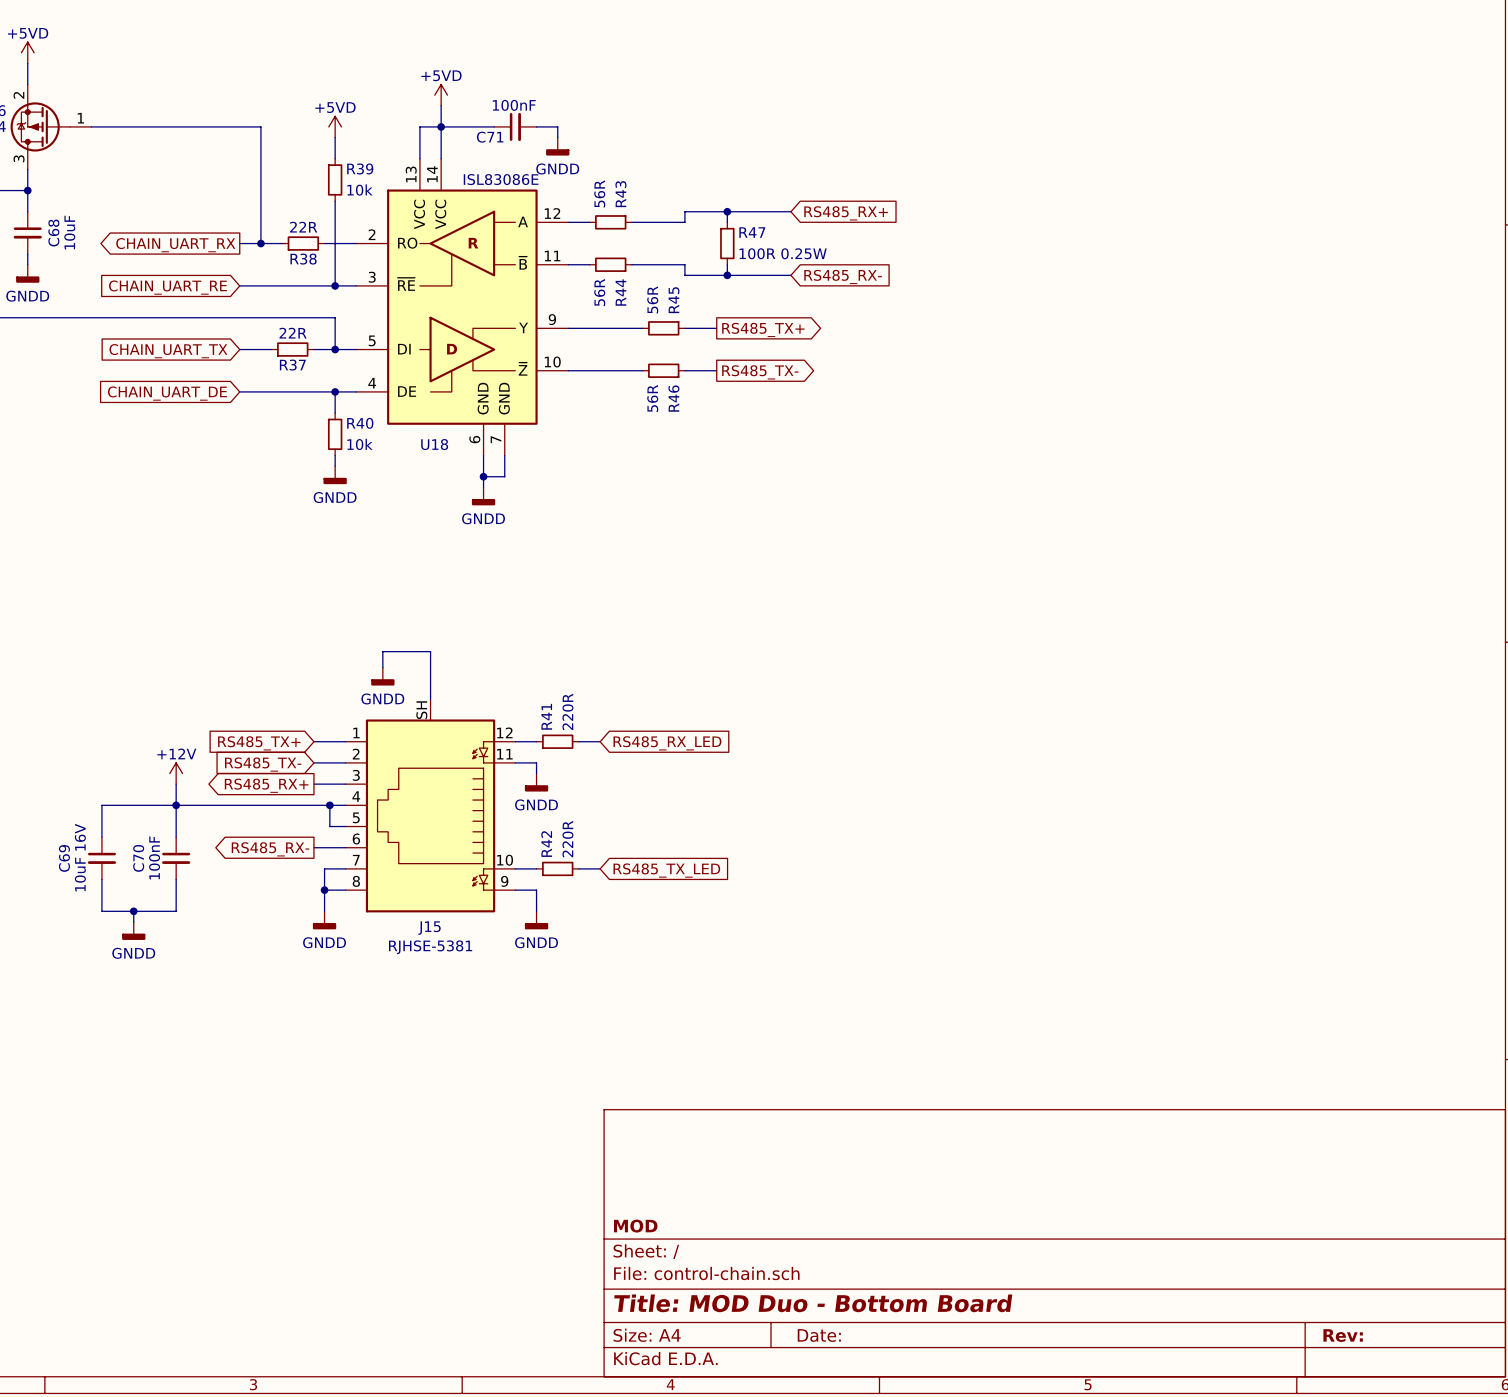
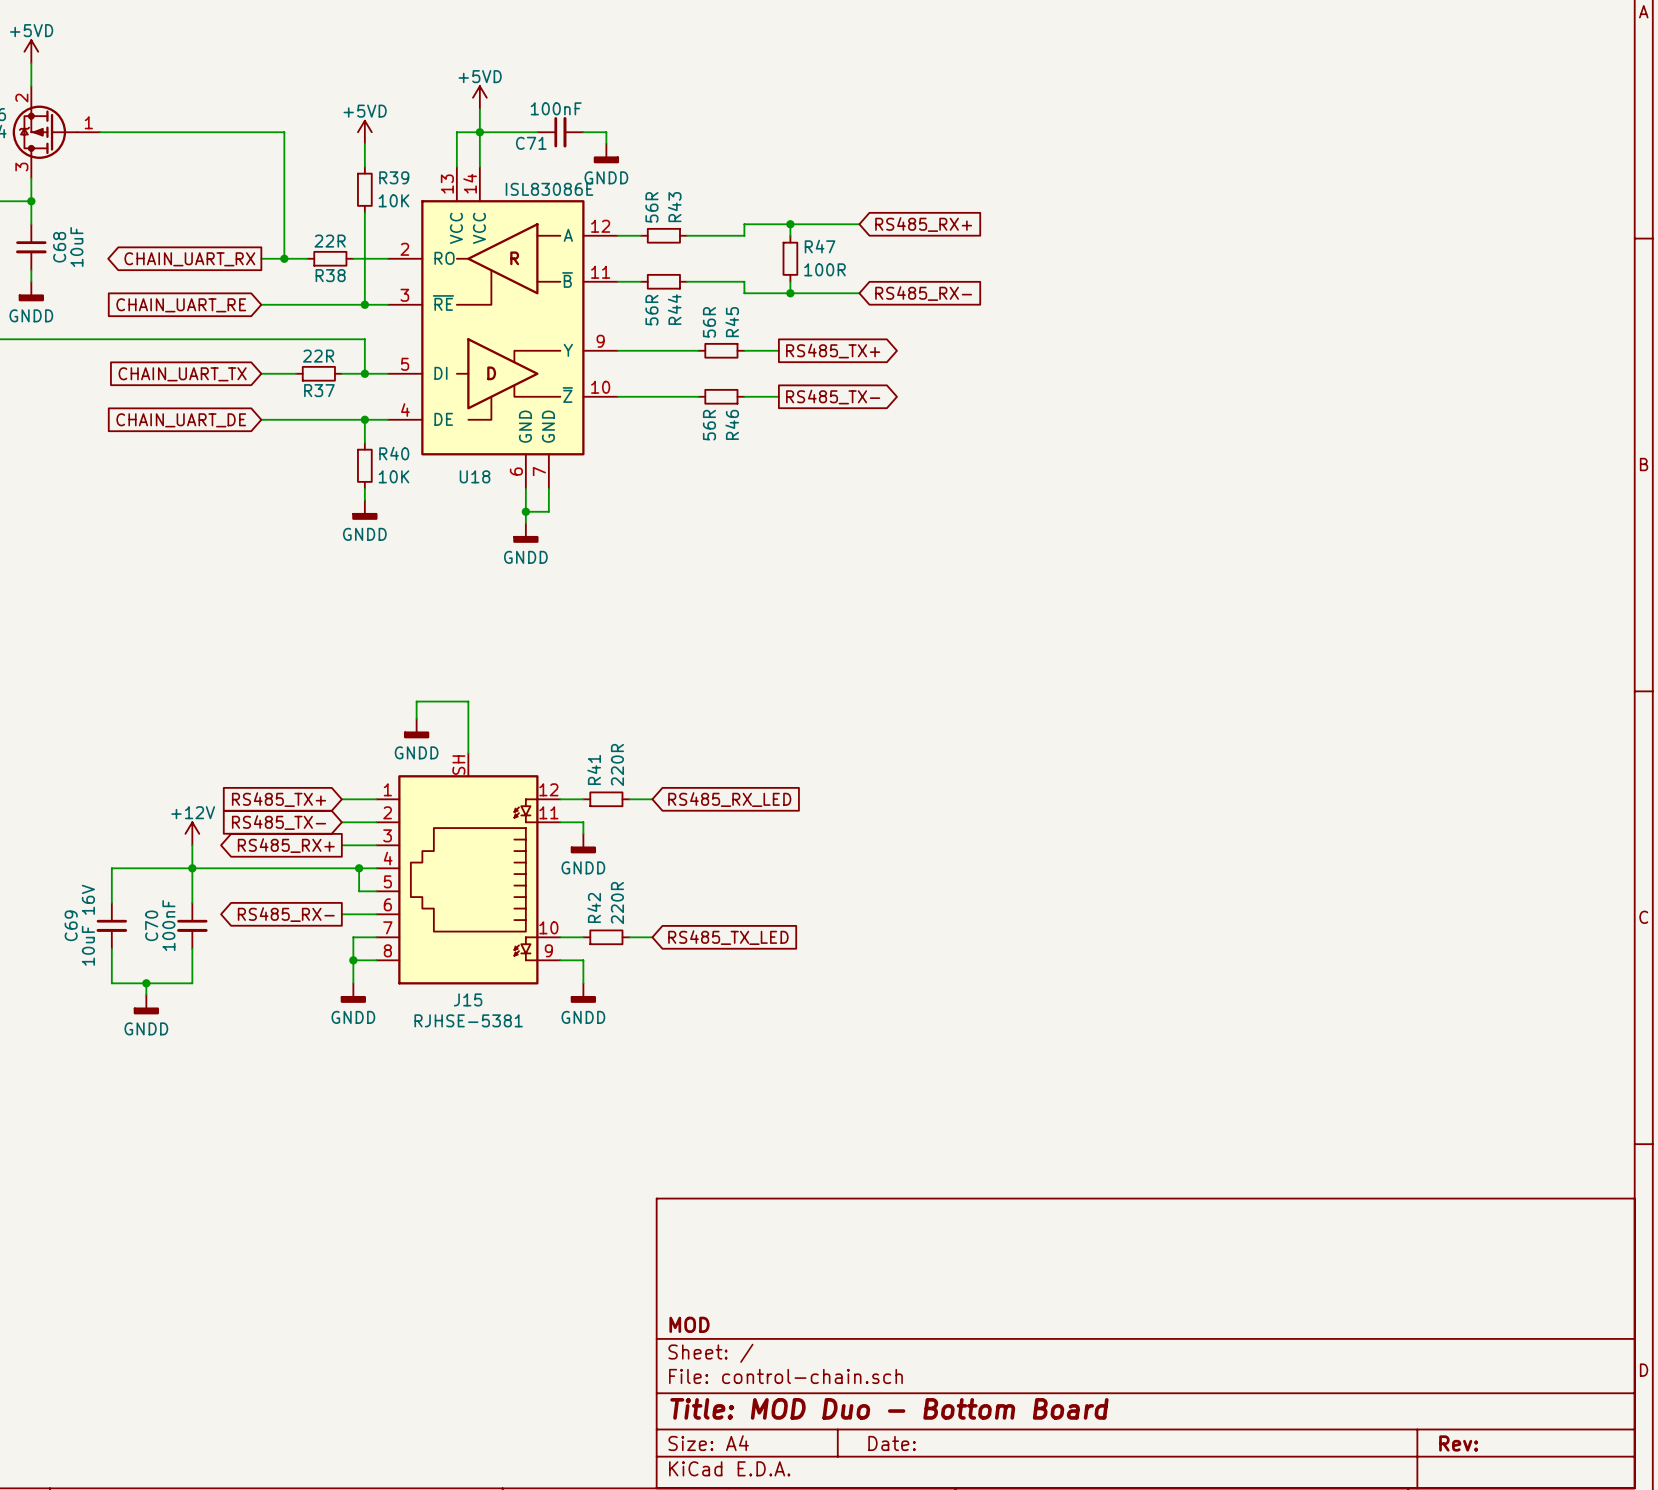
R39 value: 10k (359, 190) -> 10K (393, 200)
R47 value: 100R 0.25W (783, 253) -> 100R (824, 269)
R40 value: 10k (359, 444) -> 10K (393, 476)

